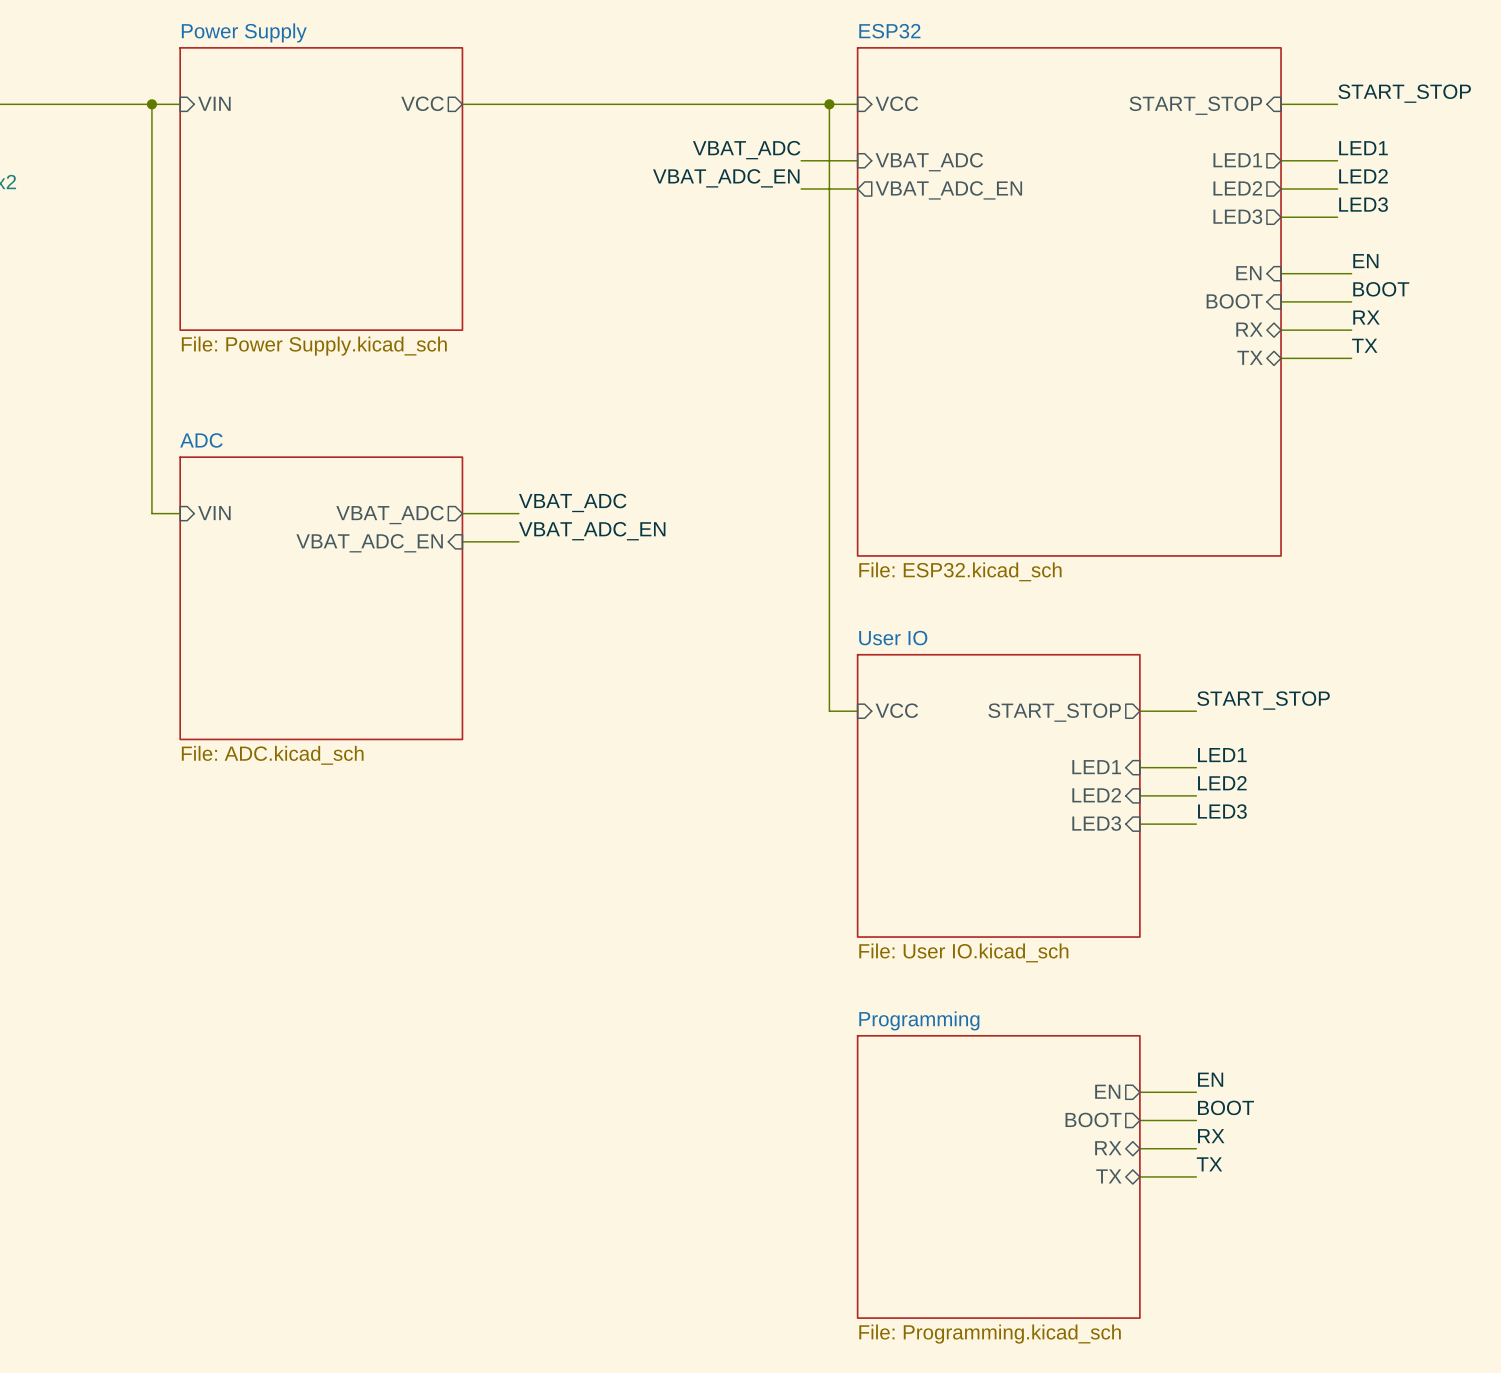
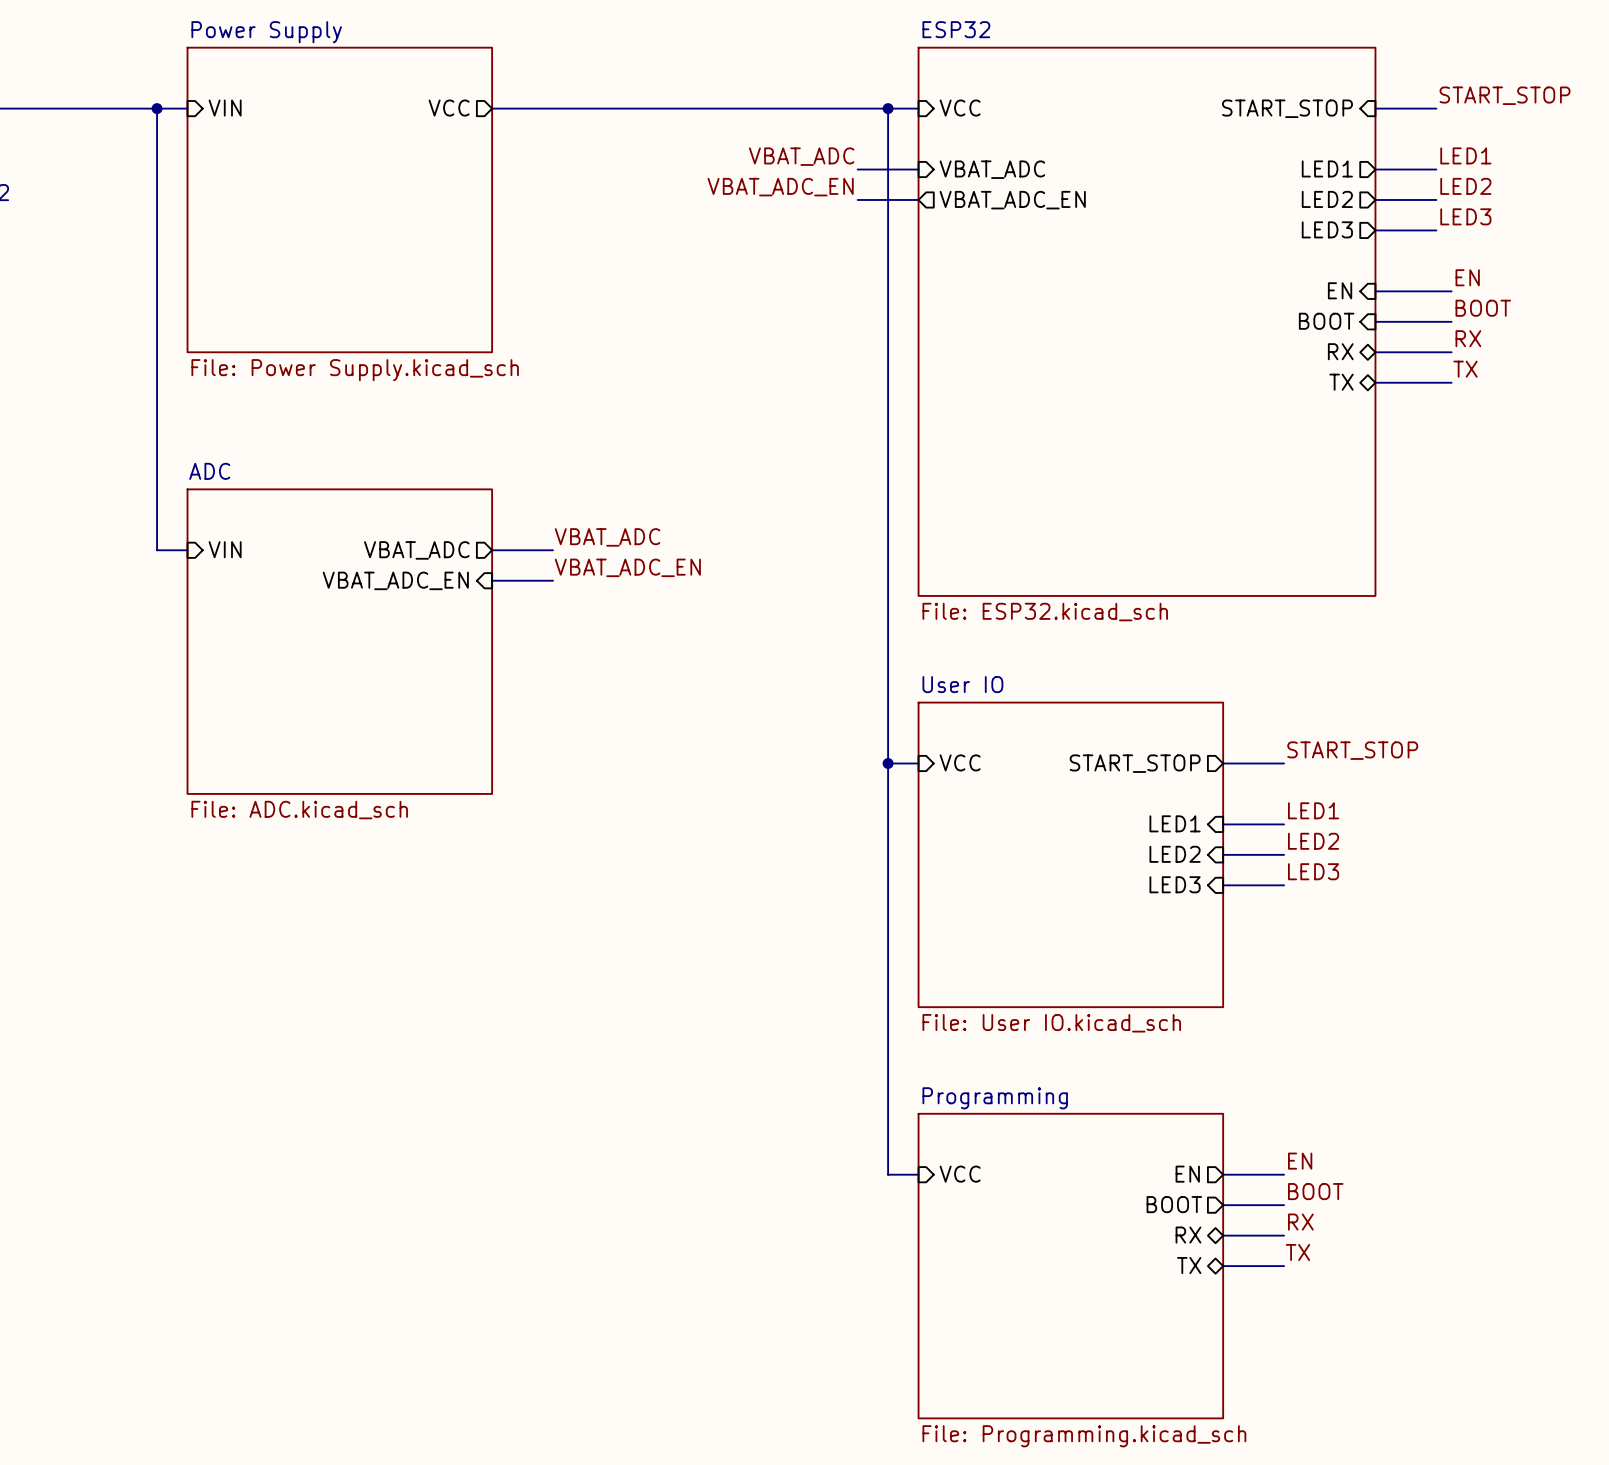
wire: none -> (888, 763) (888, 1174) (918, 1174)
junction: none -> (888, 763)
sheet pin: none -> VCC (960, 1174)

